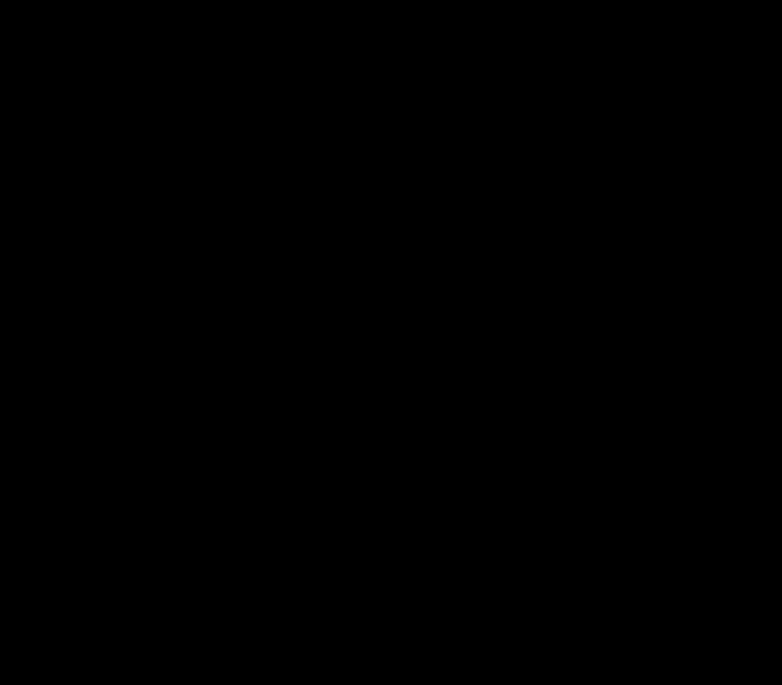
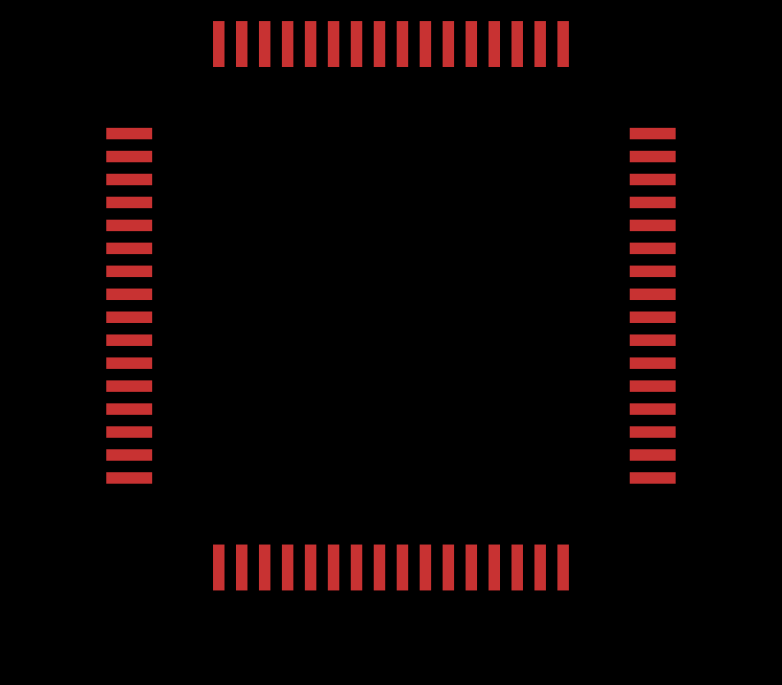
part: none -> (390, 305)

